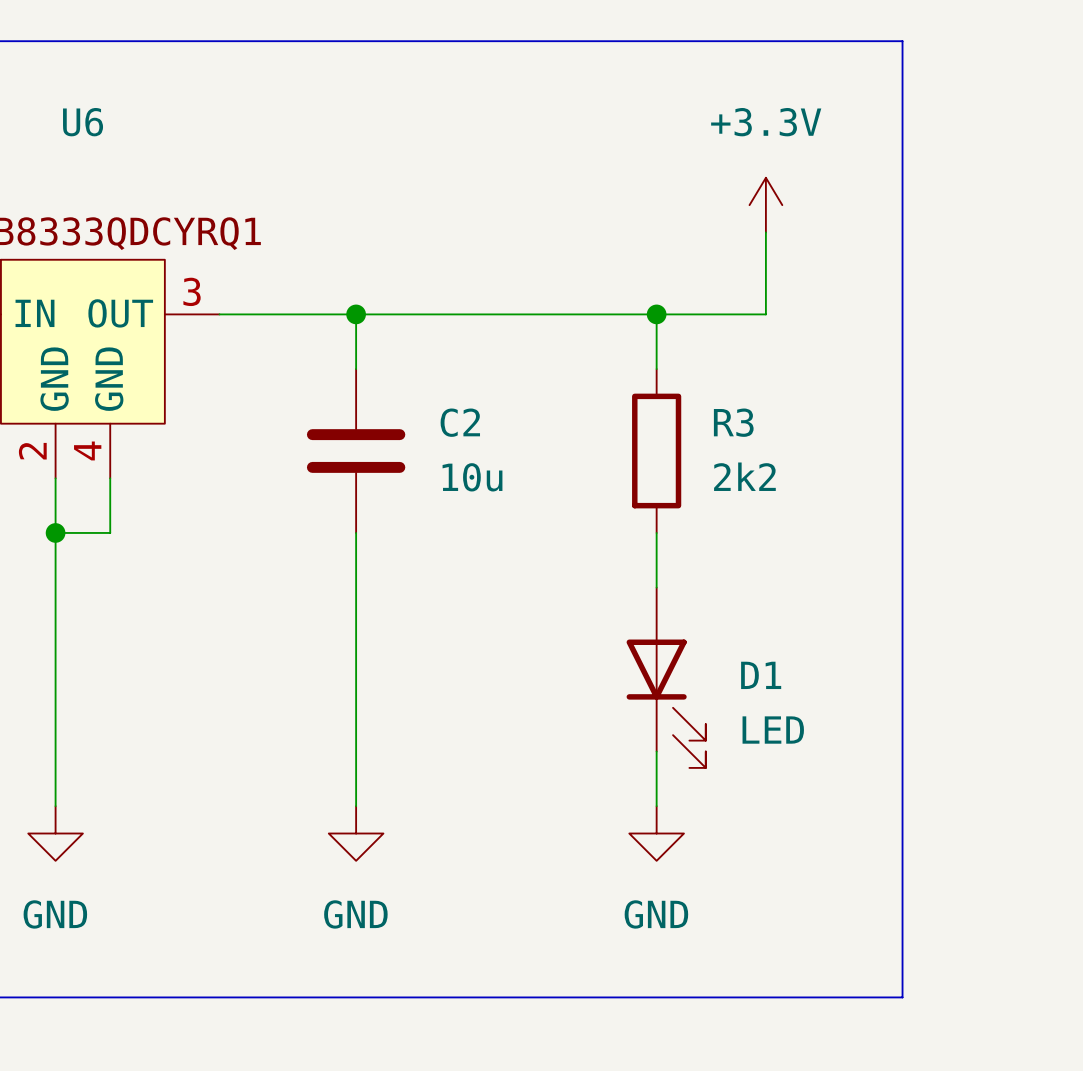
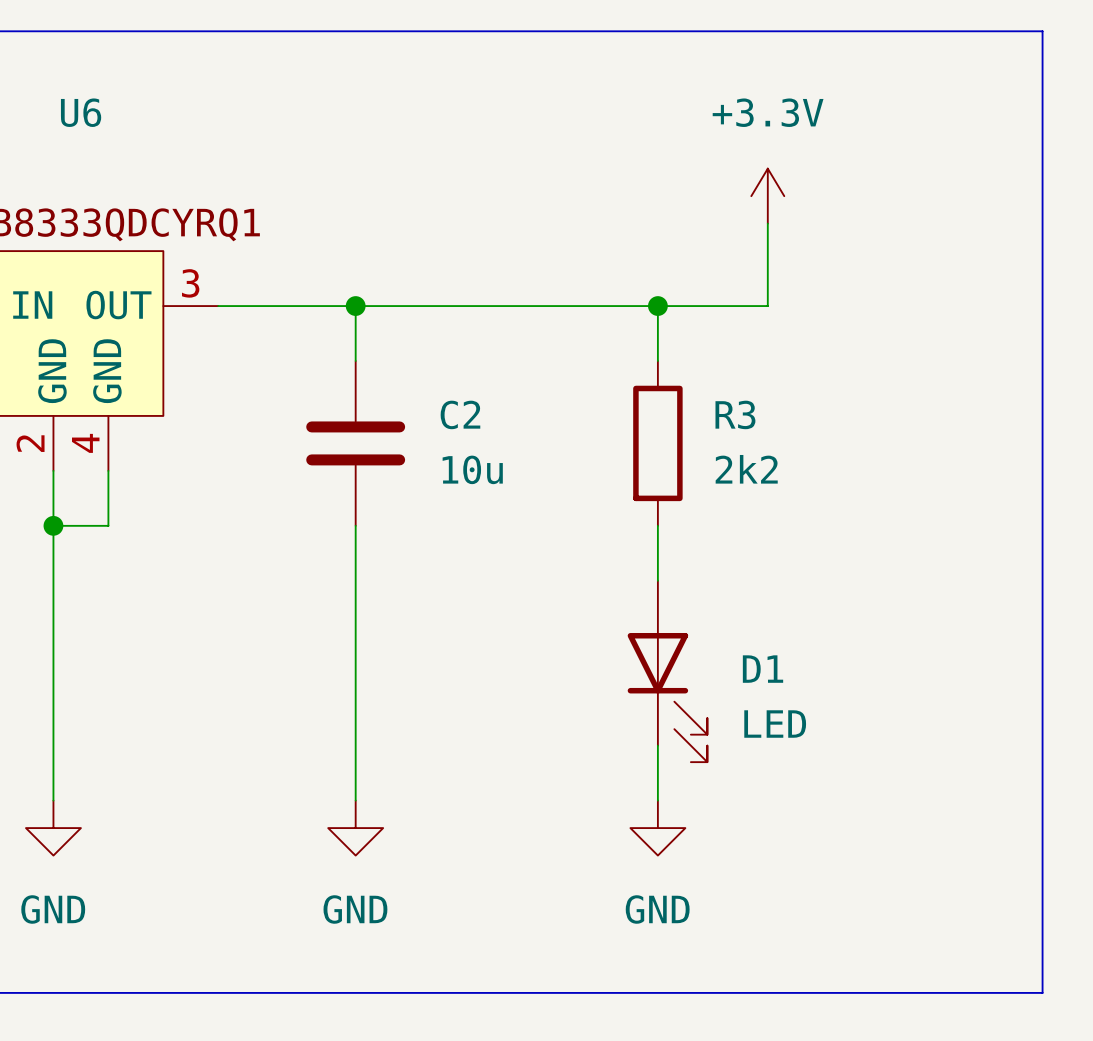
line: (902, 41) (902, 997) -> (905, 31) (1042, 31) (1042, 992) (905, 992)

